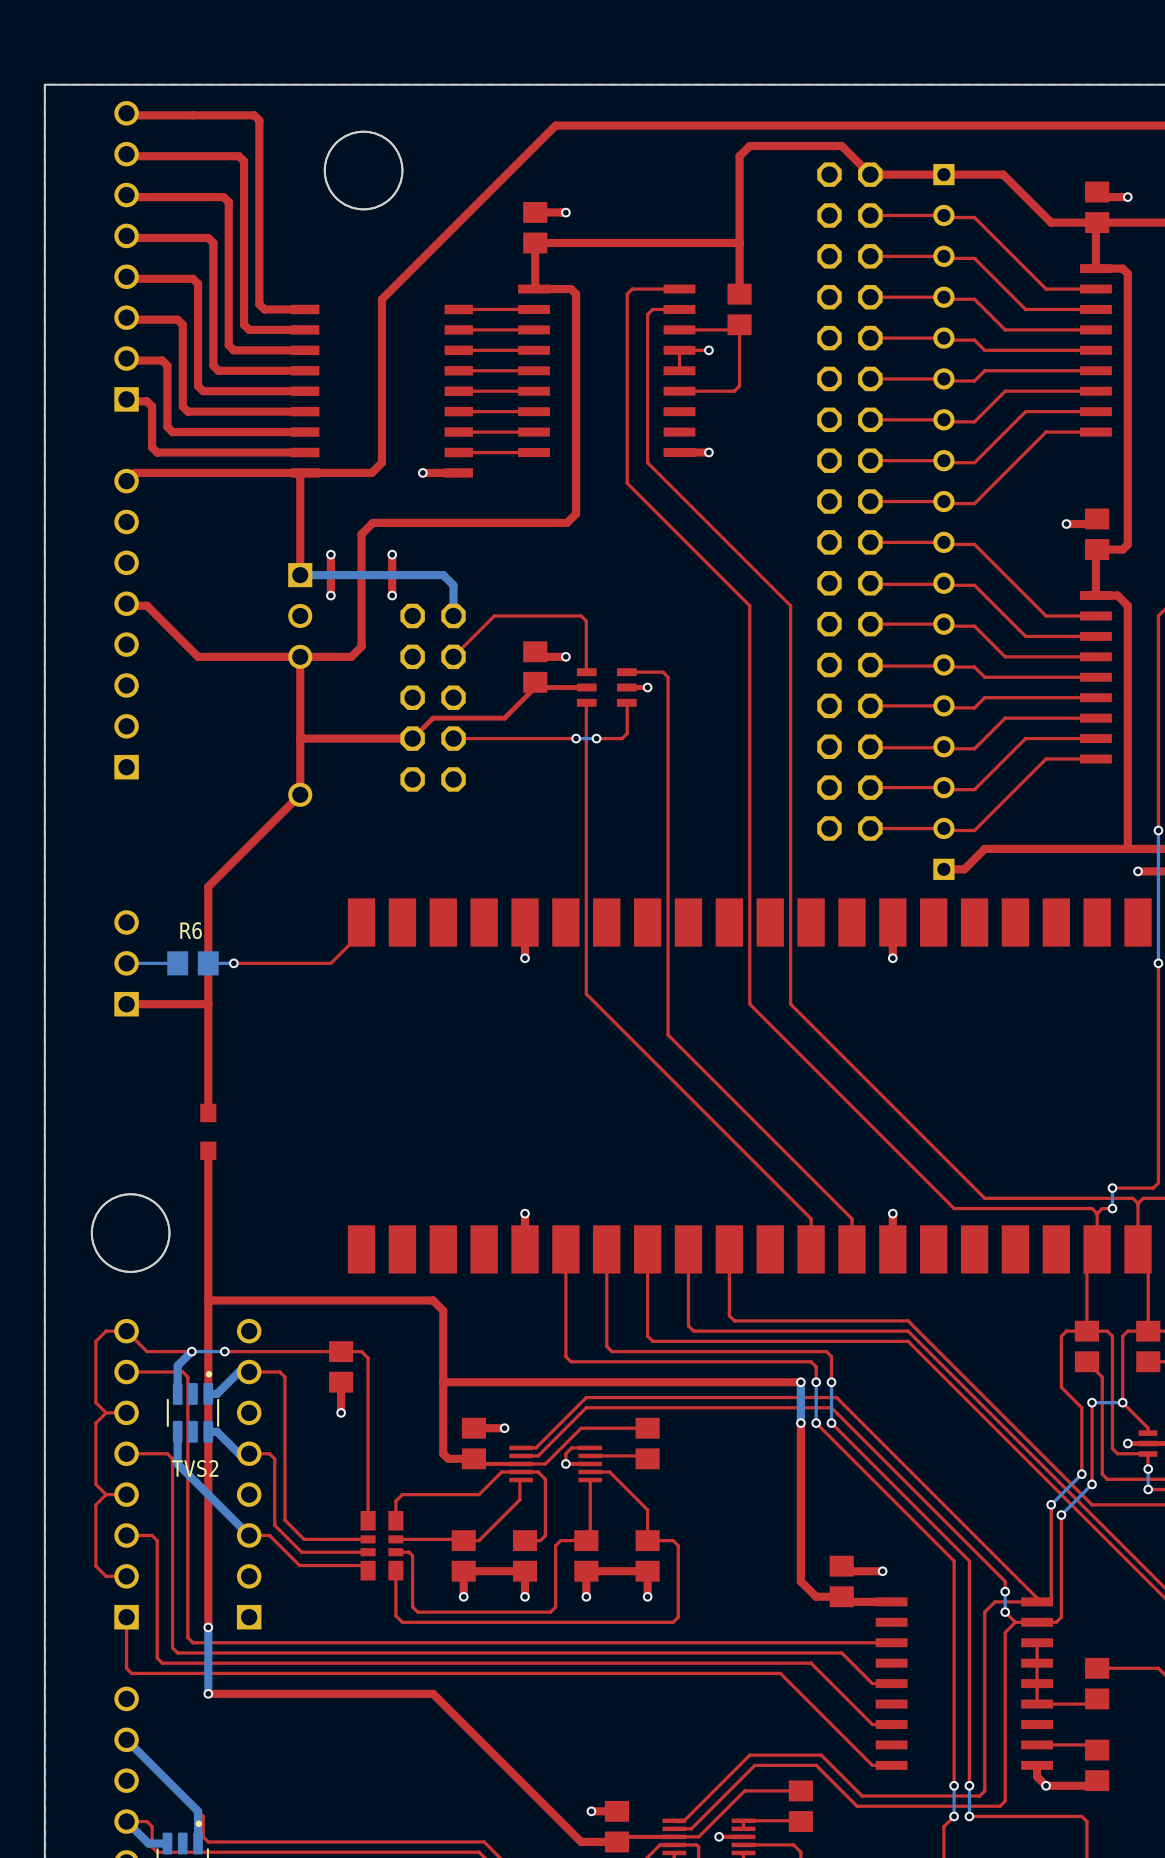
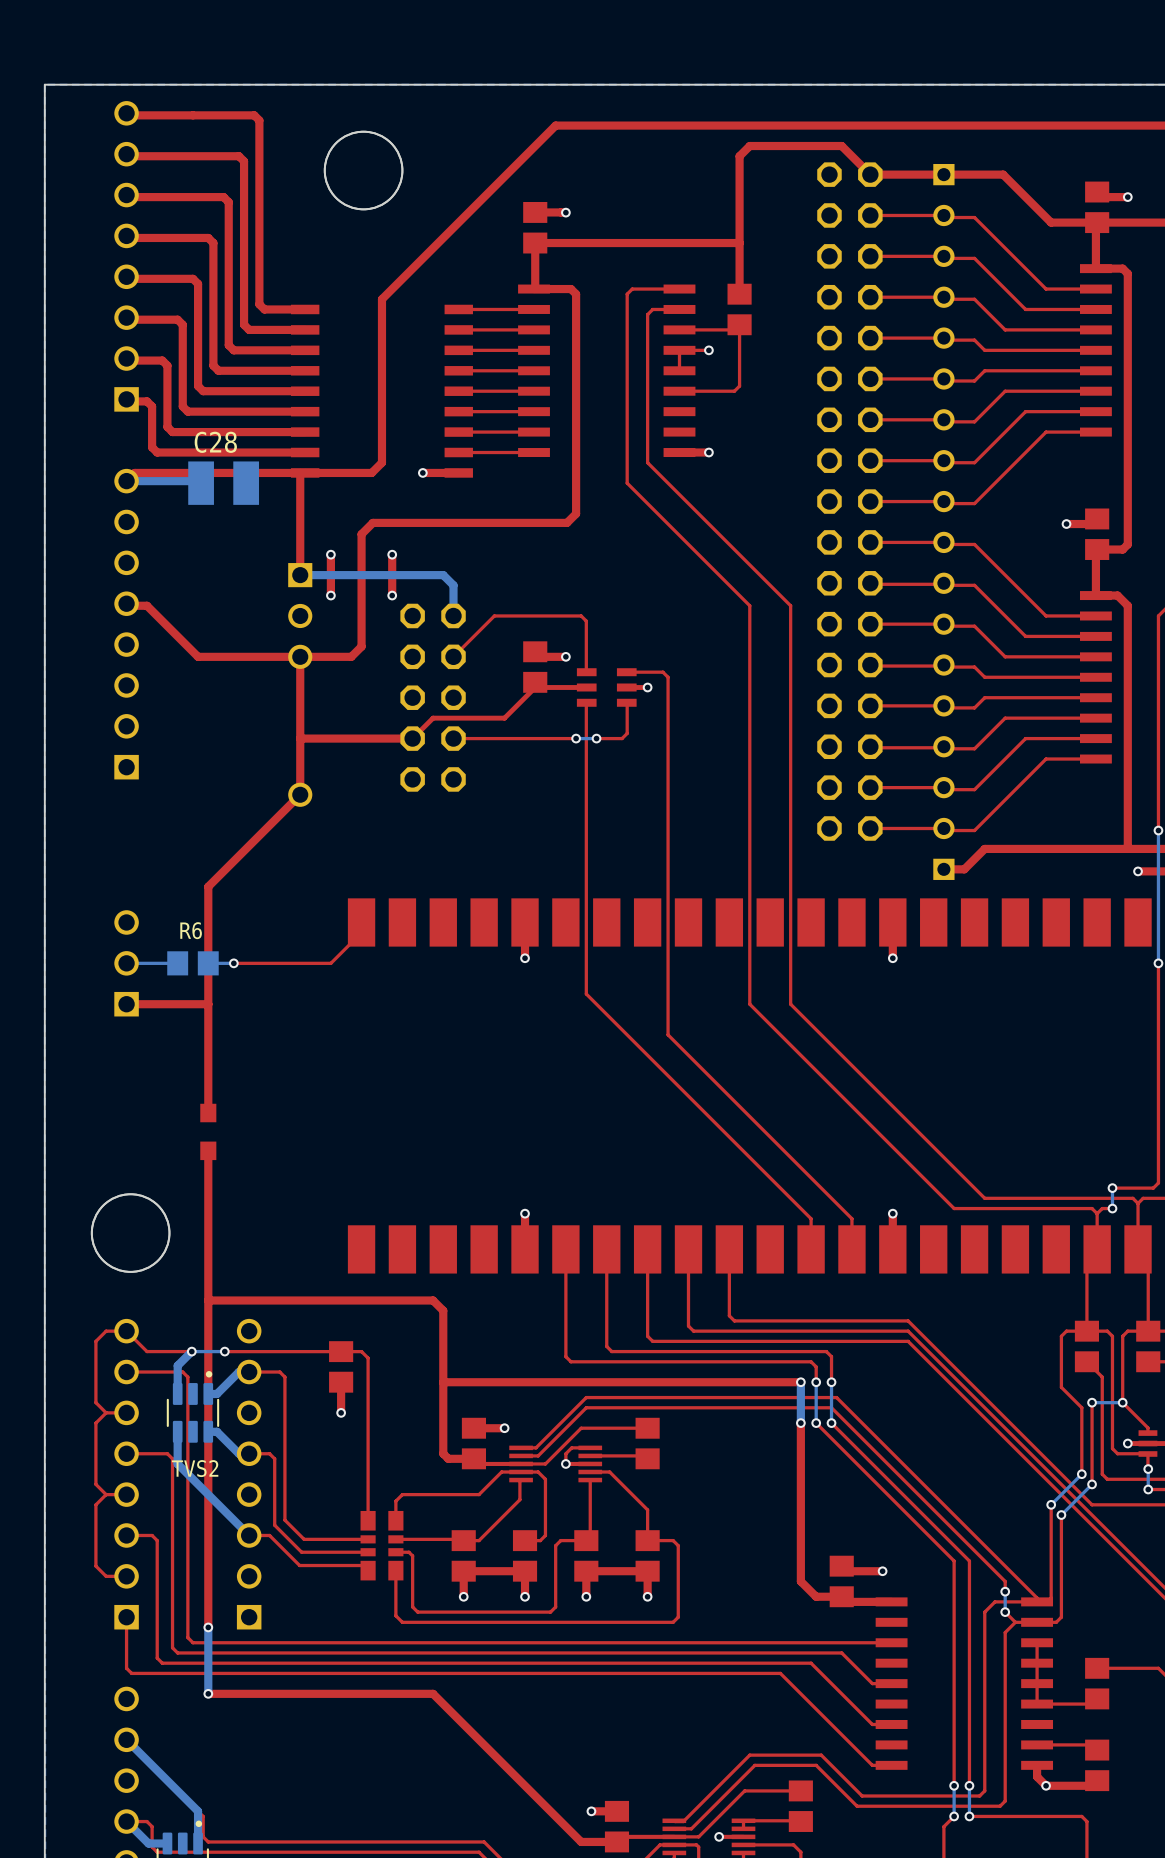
bottom track: none -> (126, 481) (199, 481) (201, 483)
C28: none -> (223, 483)

